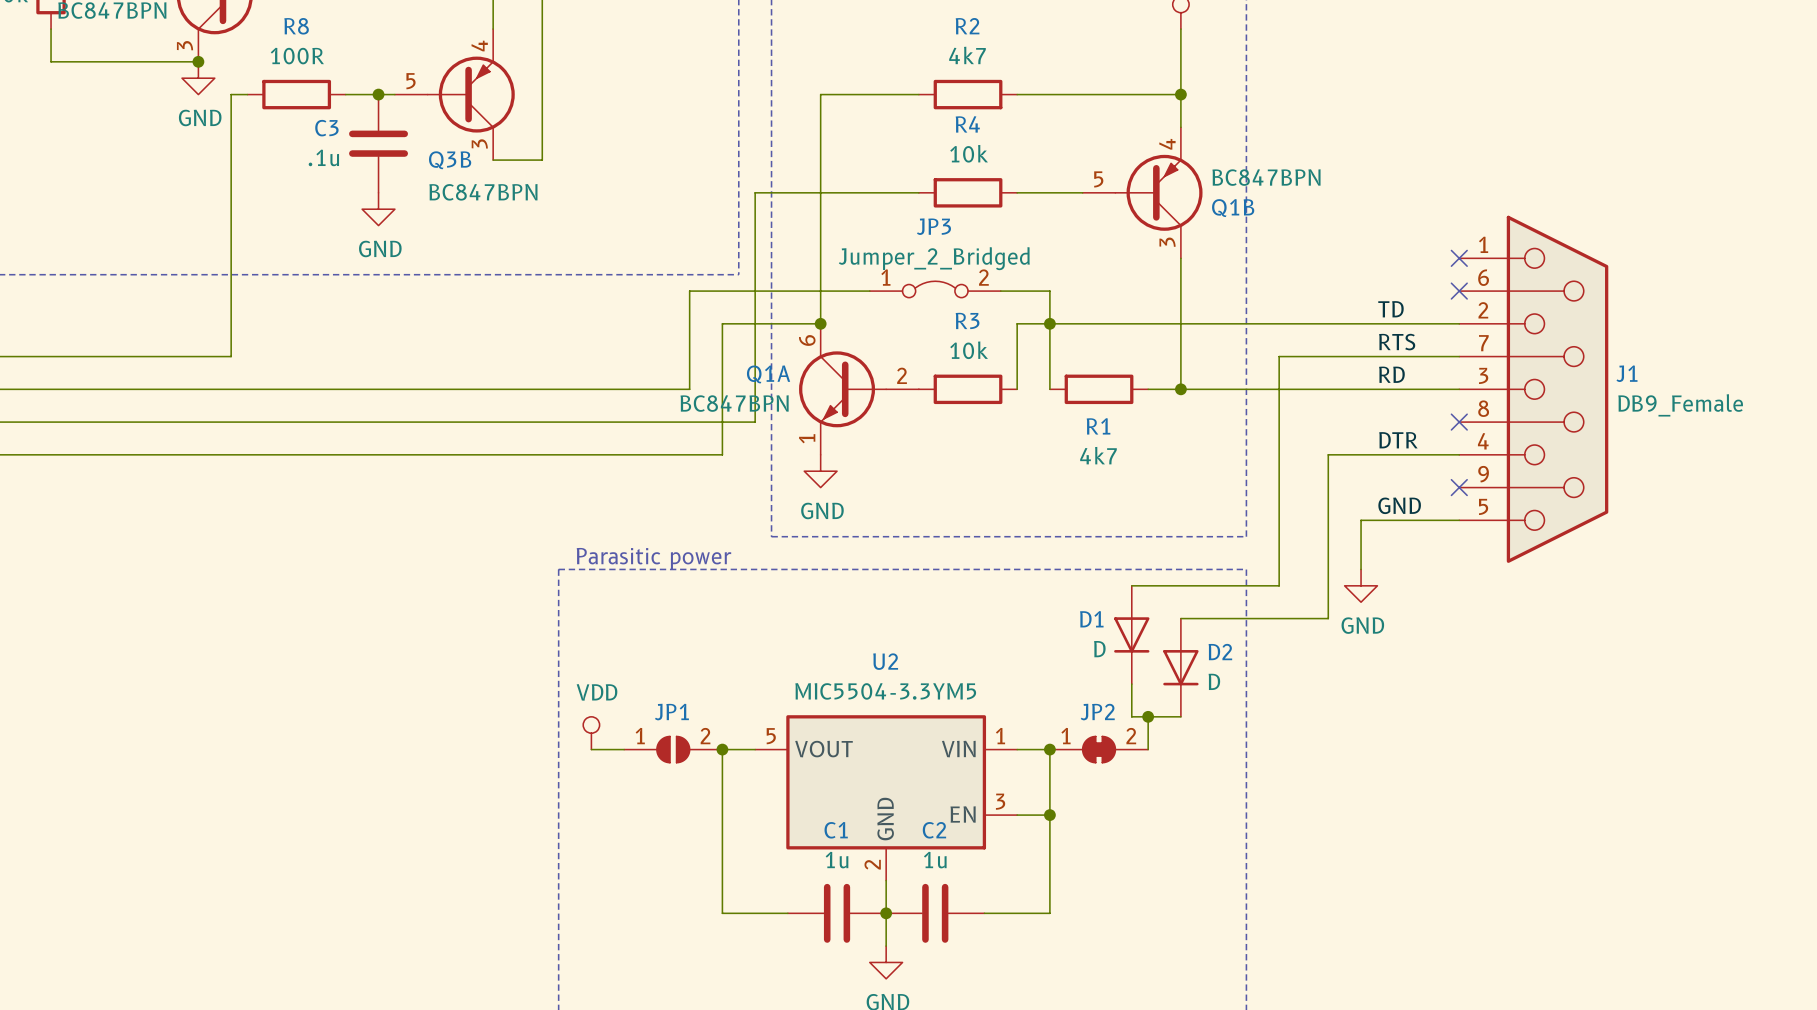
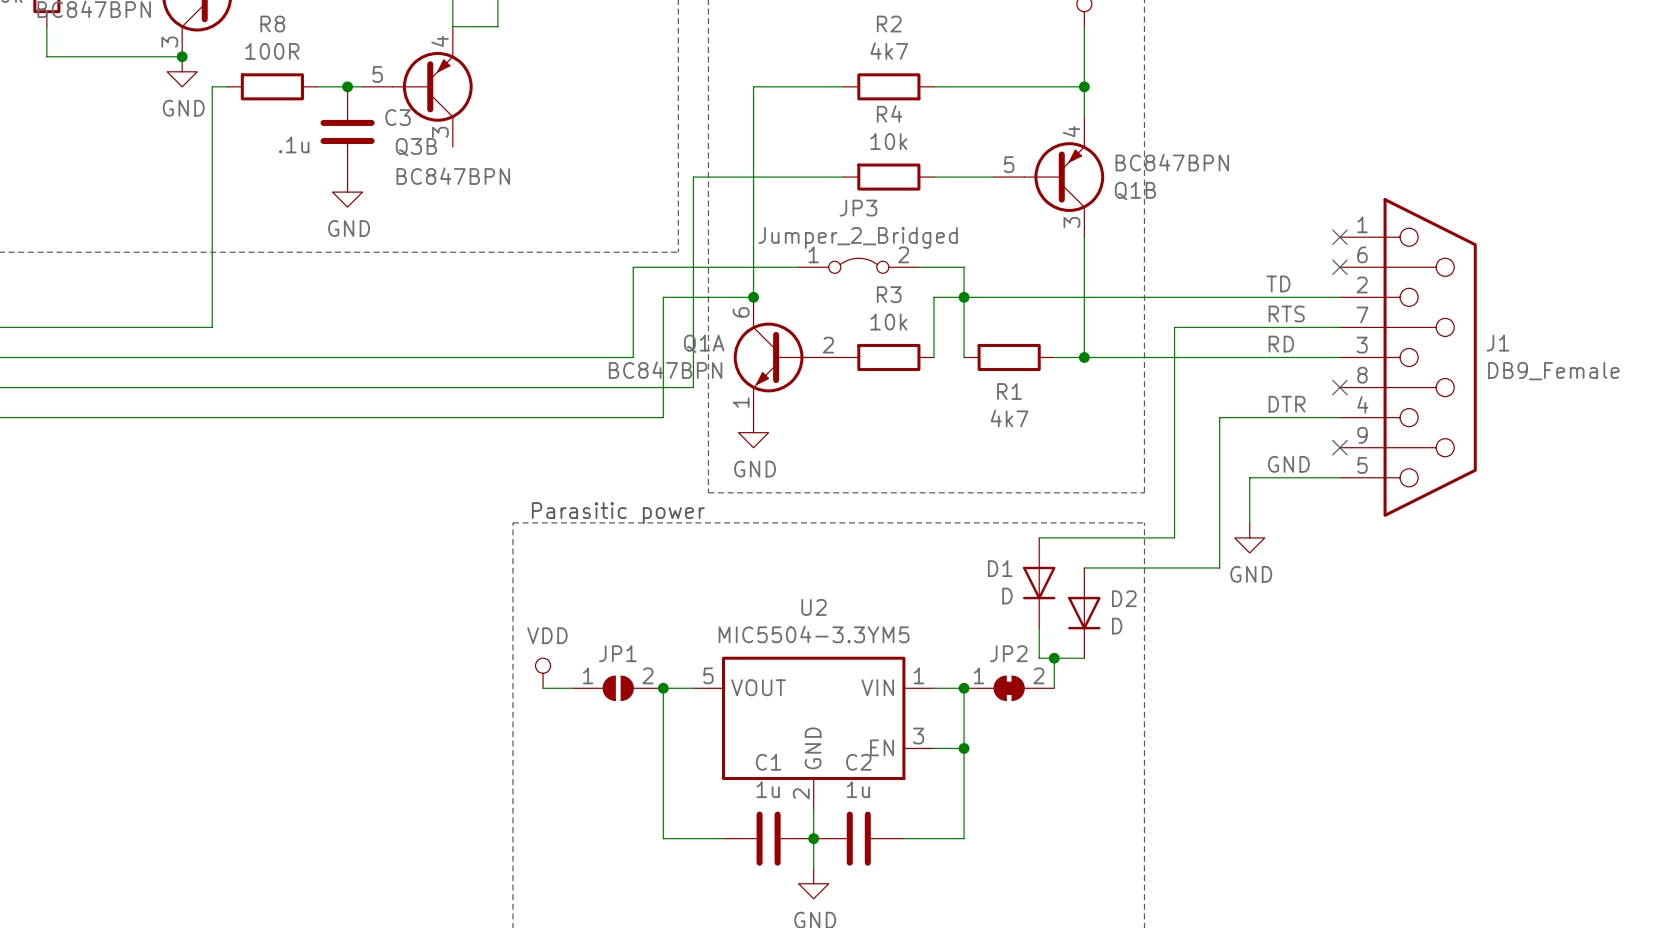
wire: (542, 29) (542, 160) (493, 160) -> (497, 26) (452, 26)
C3 name position: C3 (326, 128) -> C3 (398, 117)

